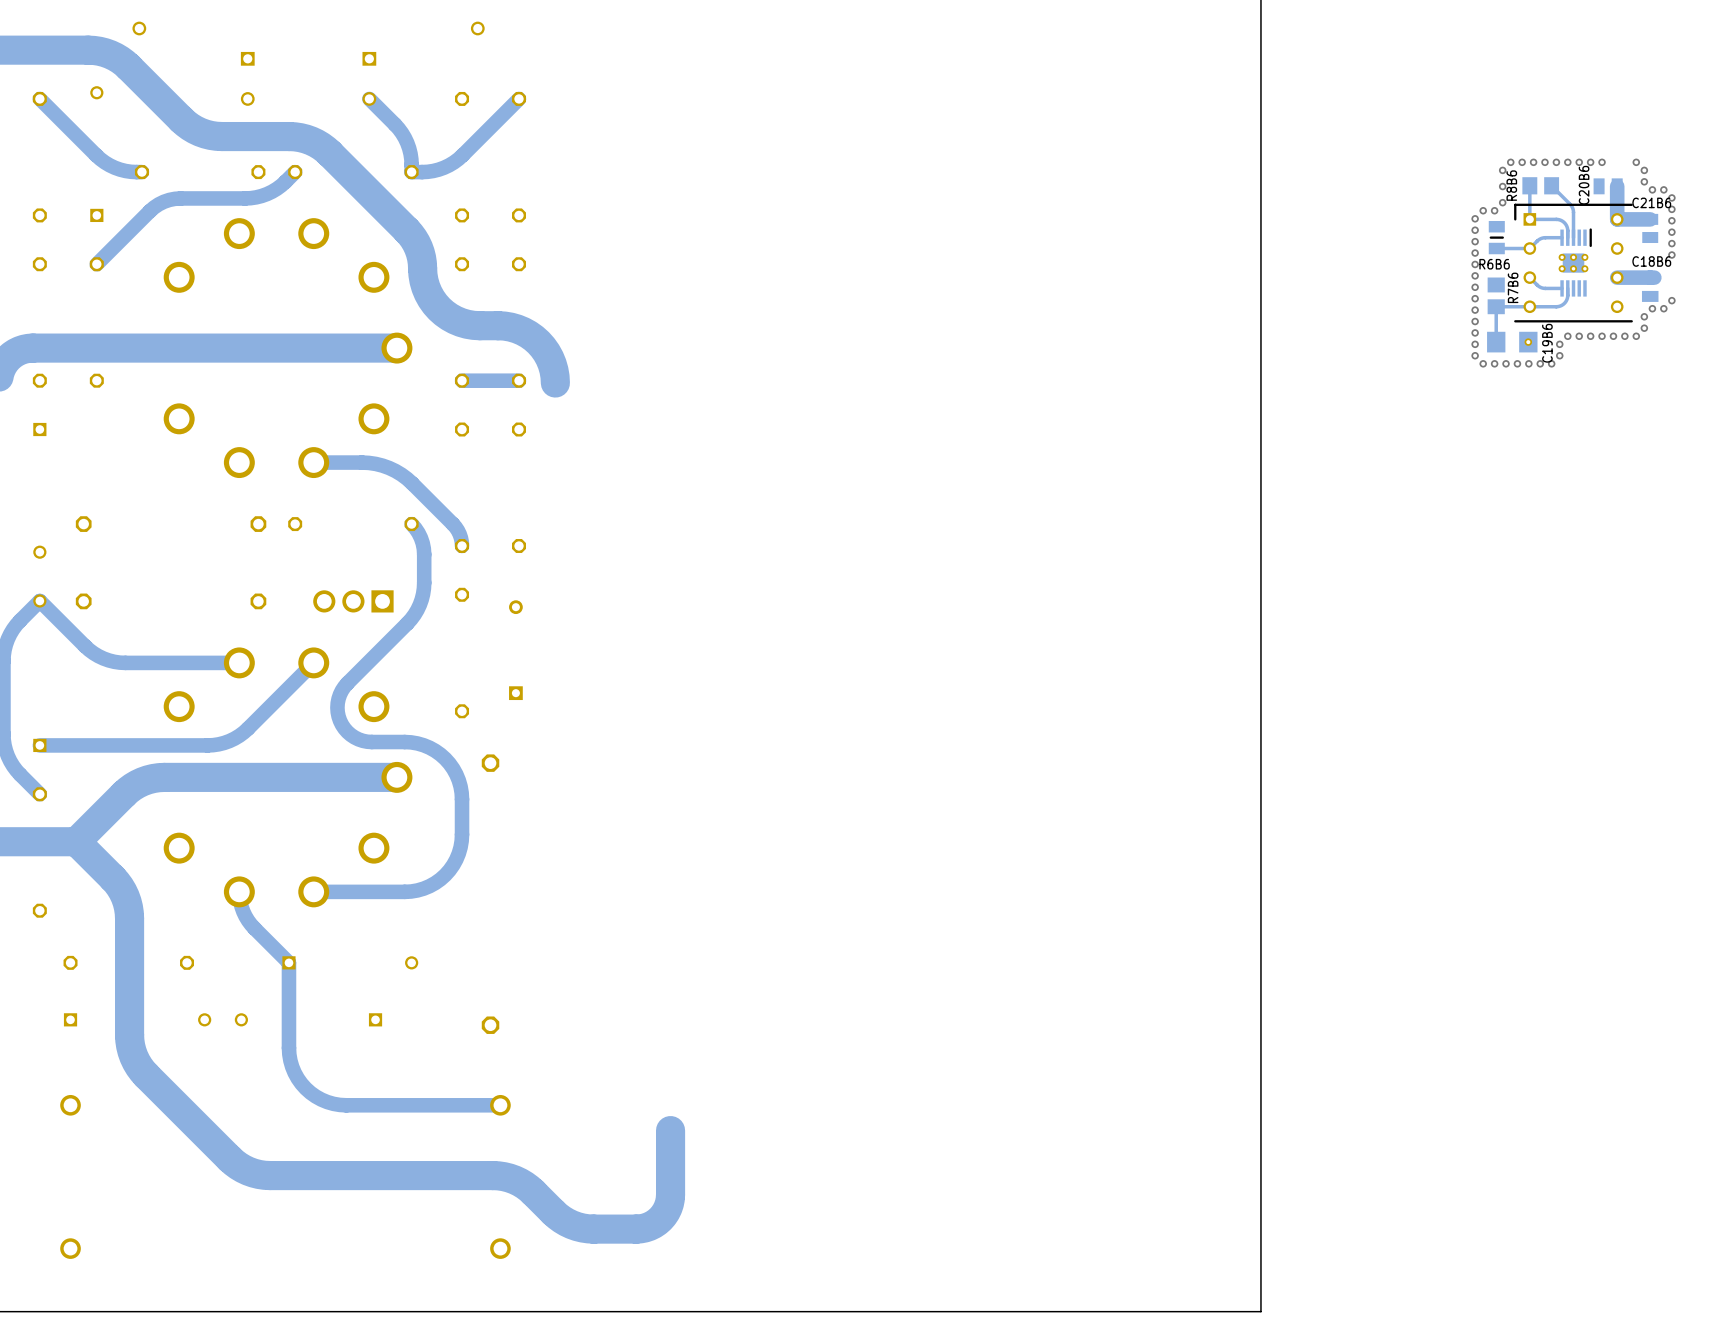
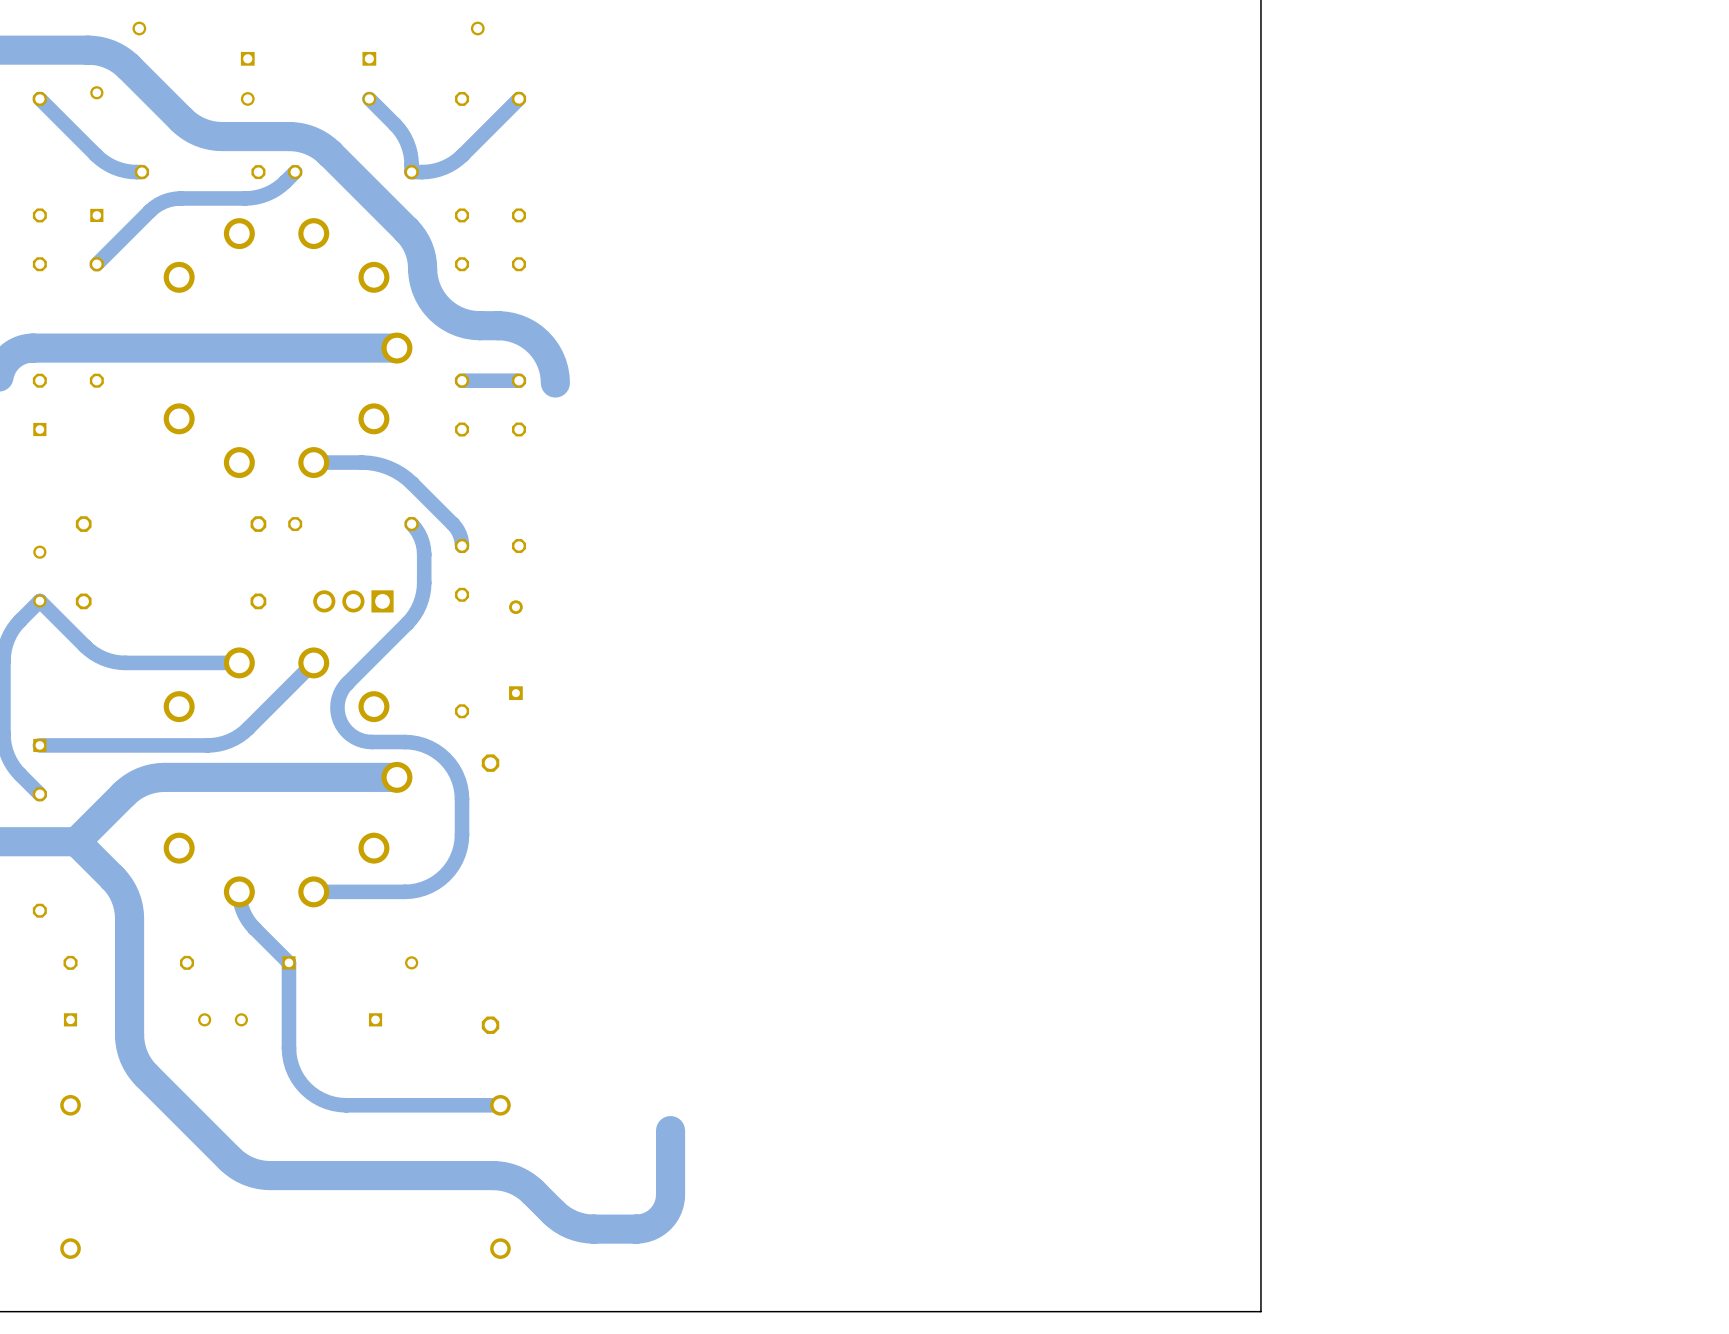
via: (1510, 162) -> none
via: (1522, 162) -> none
via: (1533, 162) -> none
via: (1544, 162) -> none
via: (1556, 162) -> none
via: (1567, 162) -> none
via: (1579, 162) -> none
via: (1590, 162) -> none
via: (1602, 162) -> none
via: (1636, 162) -> none
via: (1502, 170) -> none
via: (1644, 170) -> none
via: (1644, 181) -> none
track: (1529, 185) (1529, 219) (1560, 220) (1566, 226) (1567, 237) -> none
R8B6: (1540, 185) -> none
track: (1551, 185) (1572, 208) (1573, 237) -> none
via: (1502, 186) -> none
C20B6: (1608, 186) -> none
track: (1617, 186) (1617, 219) (1650, 219) -> none
via: (1652, 189) -> none
via: (1663, 189) -> none
via: (1671, 197) -> none
via: (1502, 202) -> none
via: (1671, 209) -> none
via: (1483, 210) -> none
via: (1494, 210) -> none
via: (1475, 218) -> none
via: (1671, 220) -> none
C21B6: (1650, 228) -> none
via: (1475, 230) -> none
via: (1671, 232) -> none
R6B6: (1496, 237) -> none
track: (1562, 237) (1542, 238) (1529, 248) (1496, 248) -> none
via: (1475, 241) -> none
via: (1671, 243) -> none
via: (1475, 253) -> none
via: (1671, 255) -> none
part: (1575, 262) -> none
part: (1573, 263) -> none
via: (1475, 264) -> none
via: (1475, 275) -> none
track: (1529, 277) (1542, 288) (1562, 288) -> none
track: (1654, 277) (1617, 277) -> none
via: (1475, 287) -> none
C18B6: (1650, 287) -> none
track: (1567, 288) (1566, 299) (1559, 306) (1496, 306) (1496, 342) -> none
R7B6: (1496, 295) -> none
via: (1475, 298) -> none
via: (1671, 300) -> none
via: (1652, 308) -> none
via: (1663, 308) -> none
via: (1475, 310) -> none
via: (1644, 316) -> none
via: (1475, 321) -> none
via: (1644, 328) -> none
via: (1475, 332) -> none
via: (1567, 336) -> none
via: (1579, 336) -> none
via: (1590, 336) -> none
via: (1602, 336) -> none
via: (1613, 336) -> none
via: (1624, 336) -> none
via: (1636, 336) -> none
C19B6: (1512, 342) -> none
via: (1475, 344) -> none
via: (1559, 344) -> none
via: (1475, 355) -> none
via: (1559, 355) -> none
via: (1483, 363) -> none
via: (1494, 363) -> none
via: (1506, 363) -> none
via: (1517, 363) -> none
via: (1528, 363) -> none
via: (1540, 363) -> none
via: (1551, 363) -> none

